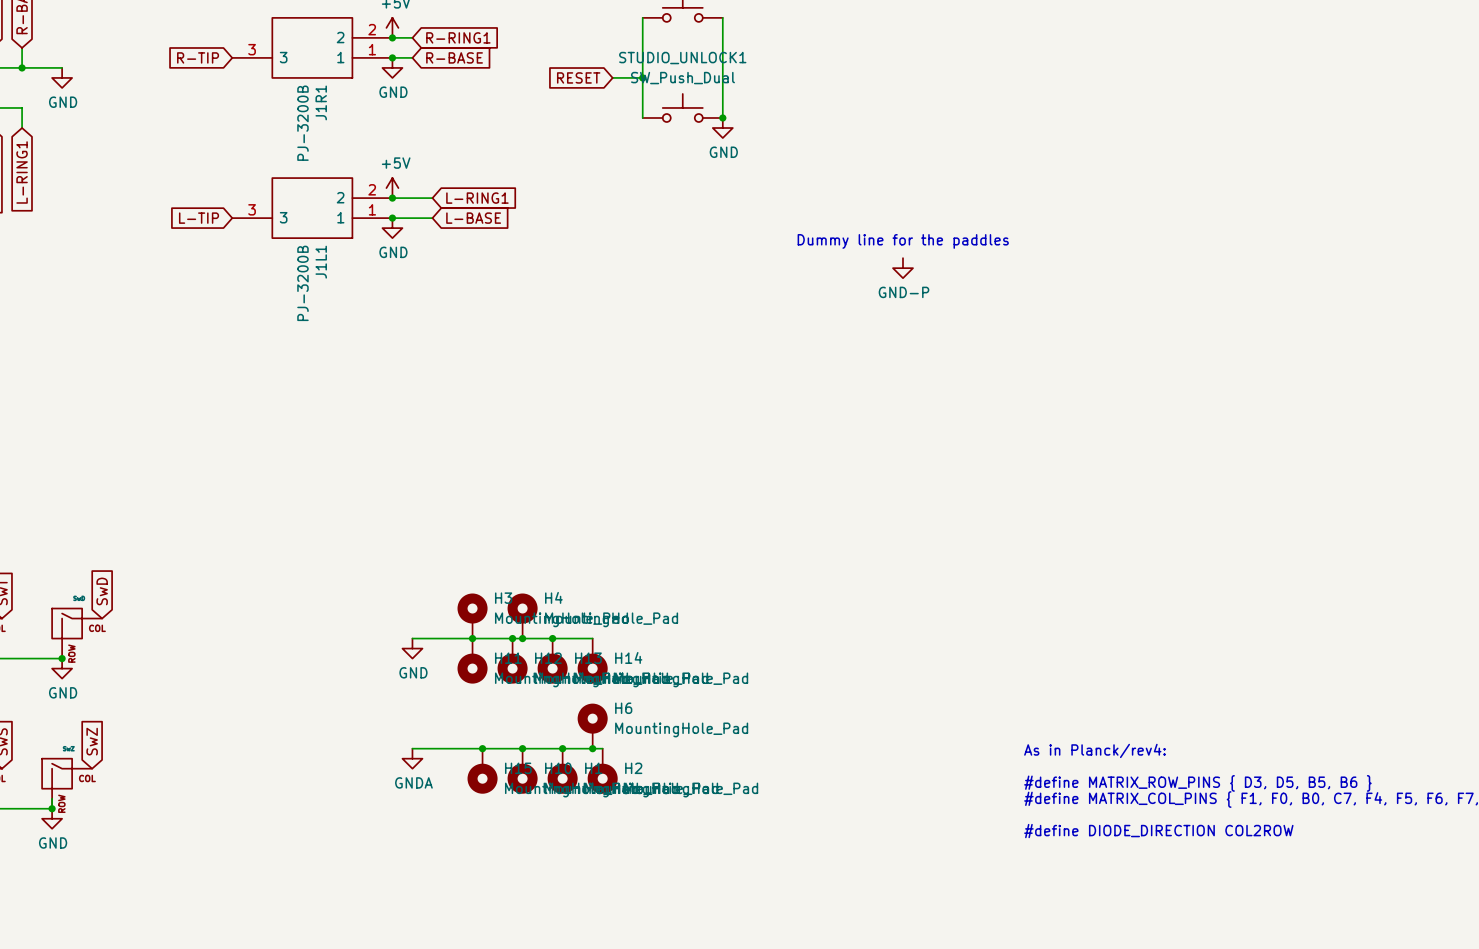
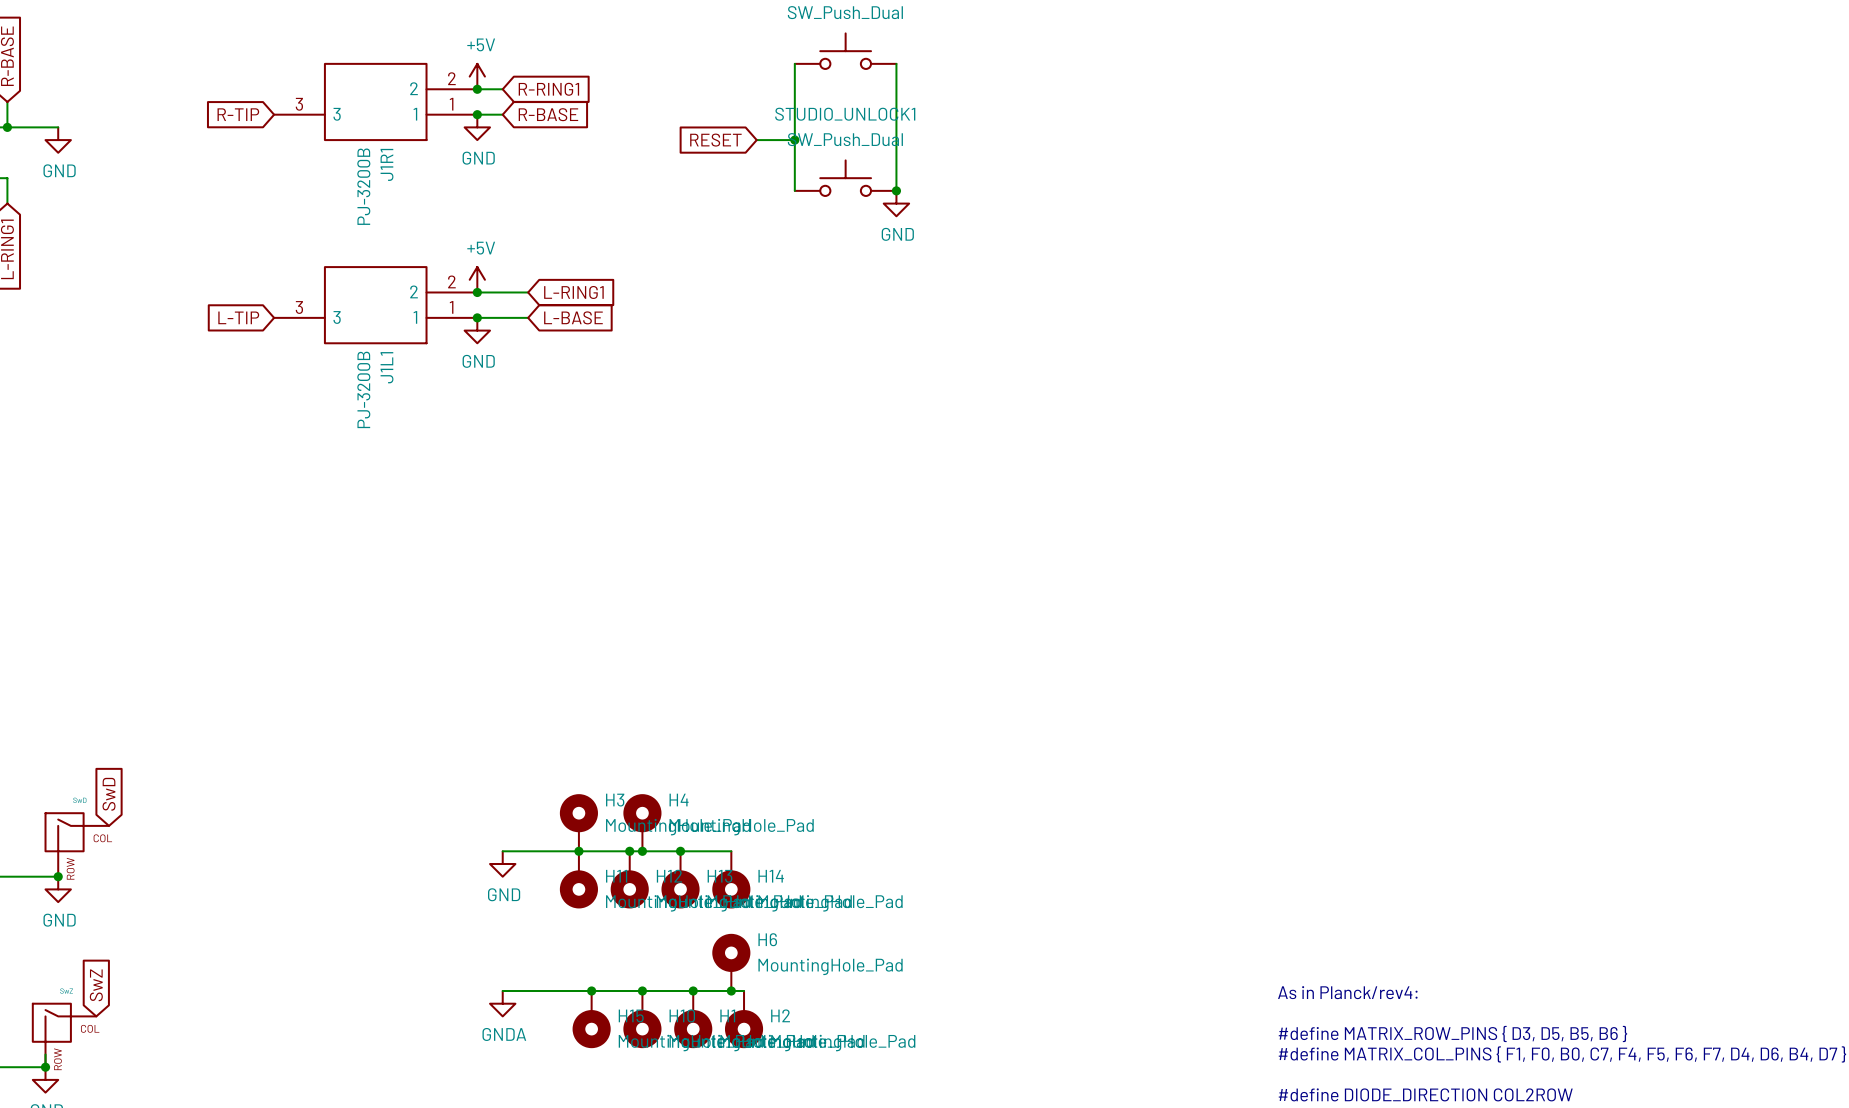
text: Dummy line for the paddles (903, 241) -> none
power symbol: GND-P (902, 268) -> none

